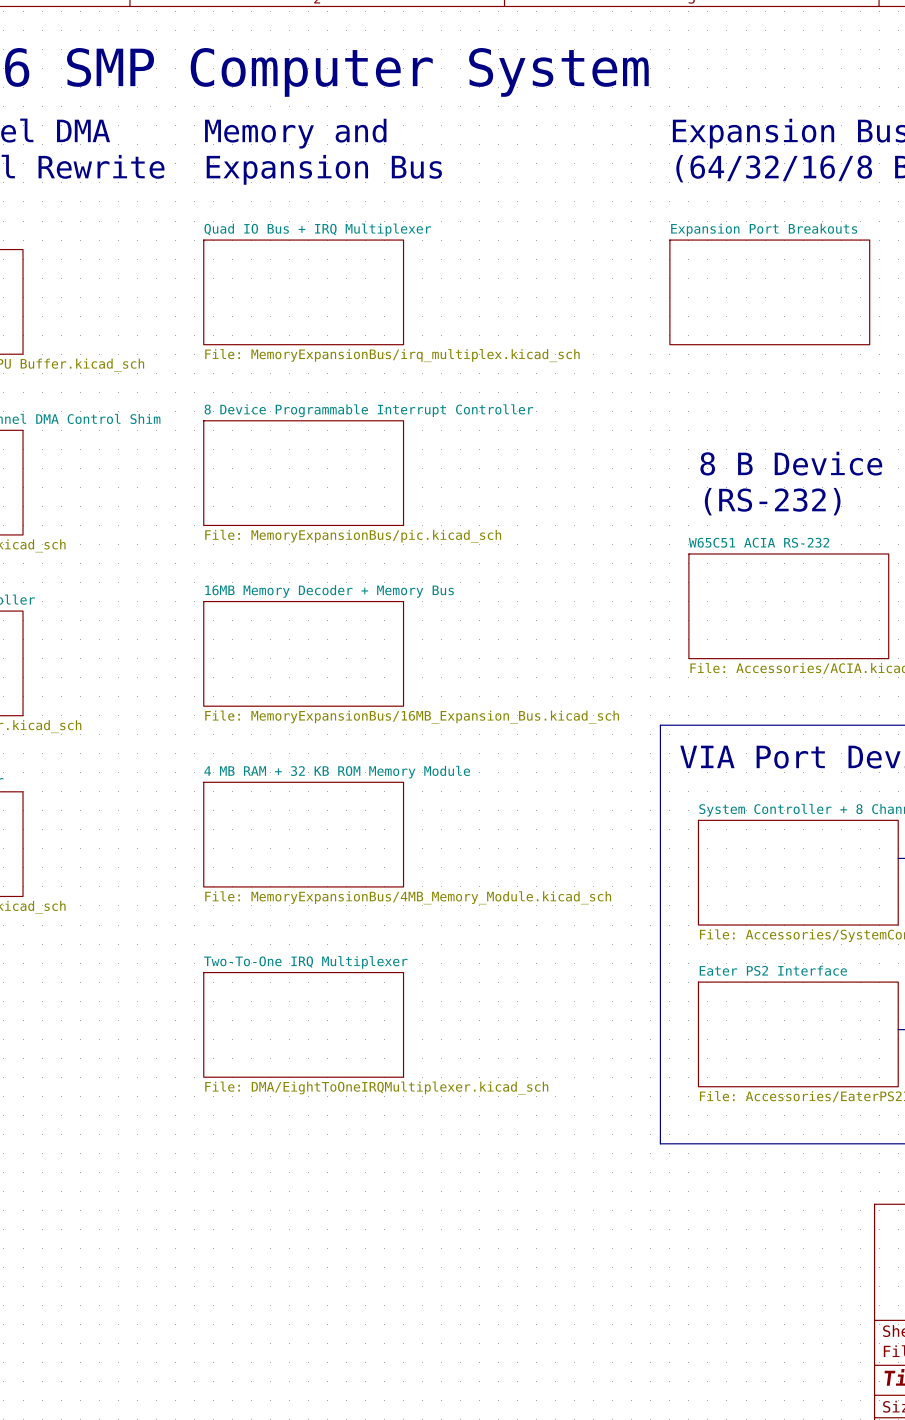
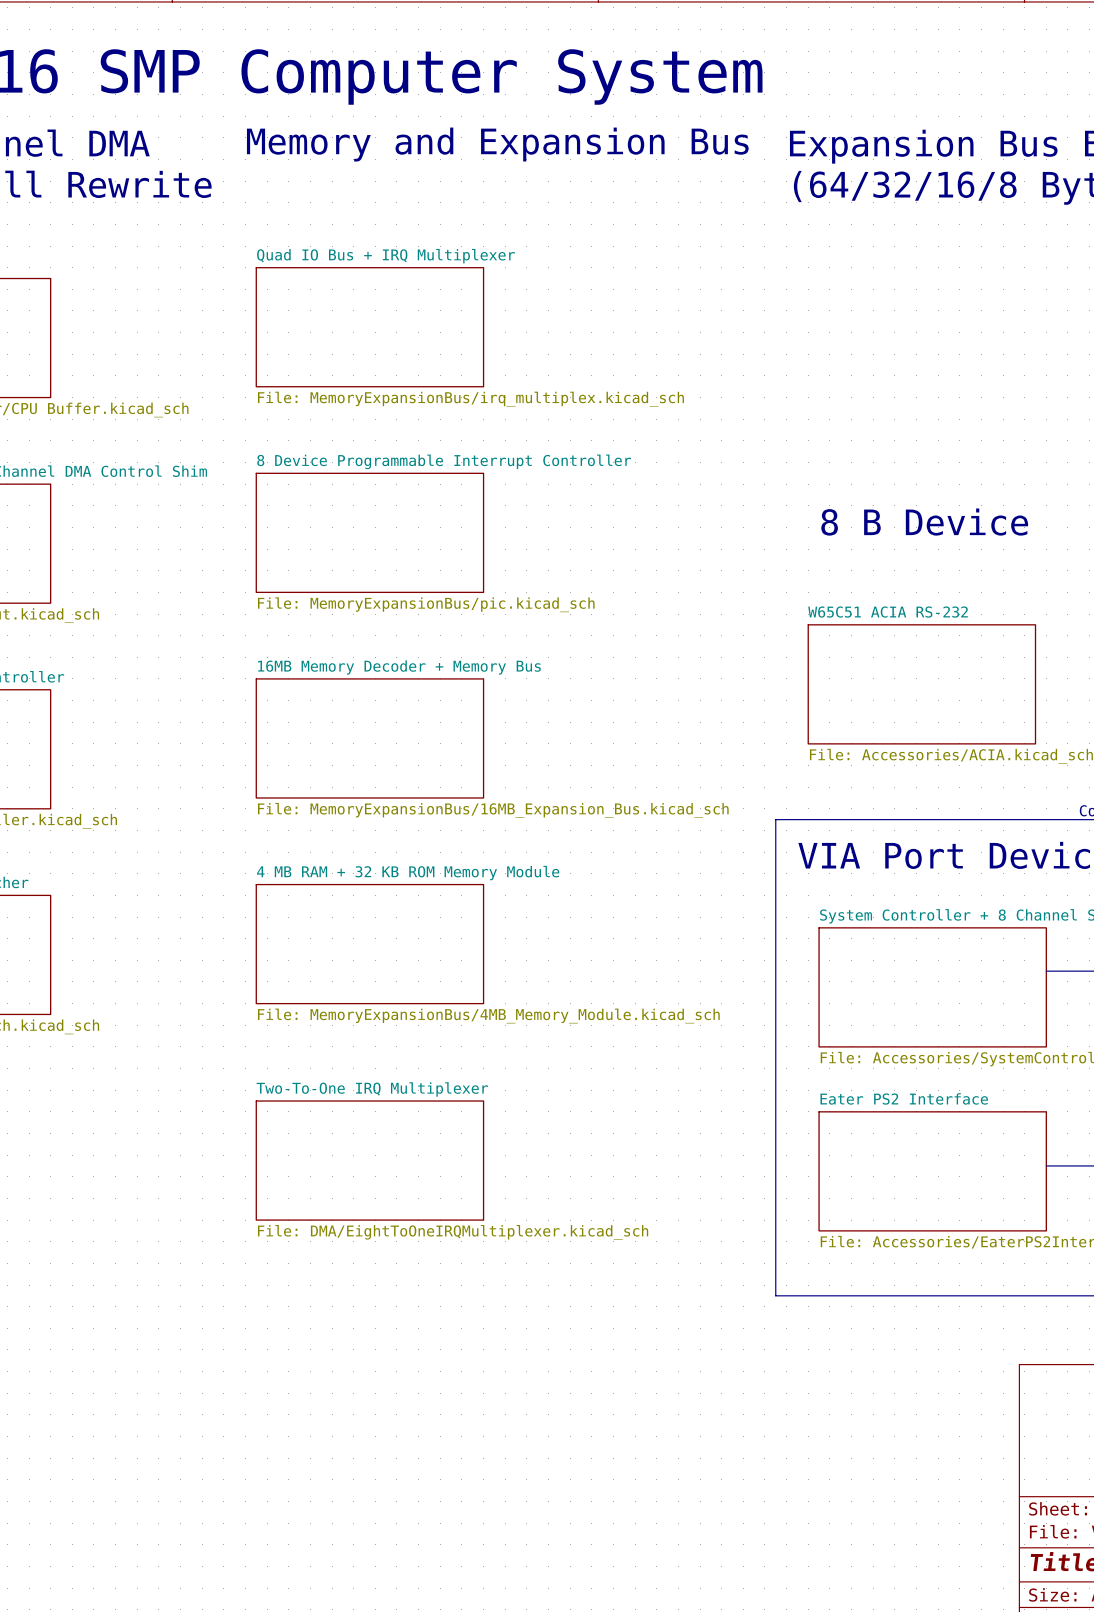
text: Memory and (295, 133) -> none
text: Expansion Bus (324, 169) -> Memory and Expansion Bus (497, 144)
sheet Expansion Port Breakouts: (769, 292) -> none
text: (RS-232) (772, 501) -> none

